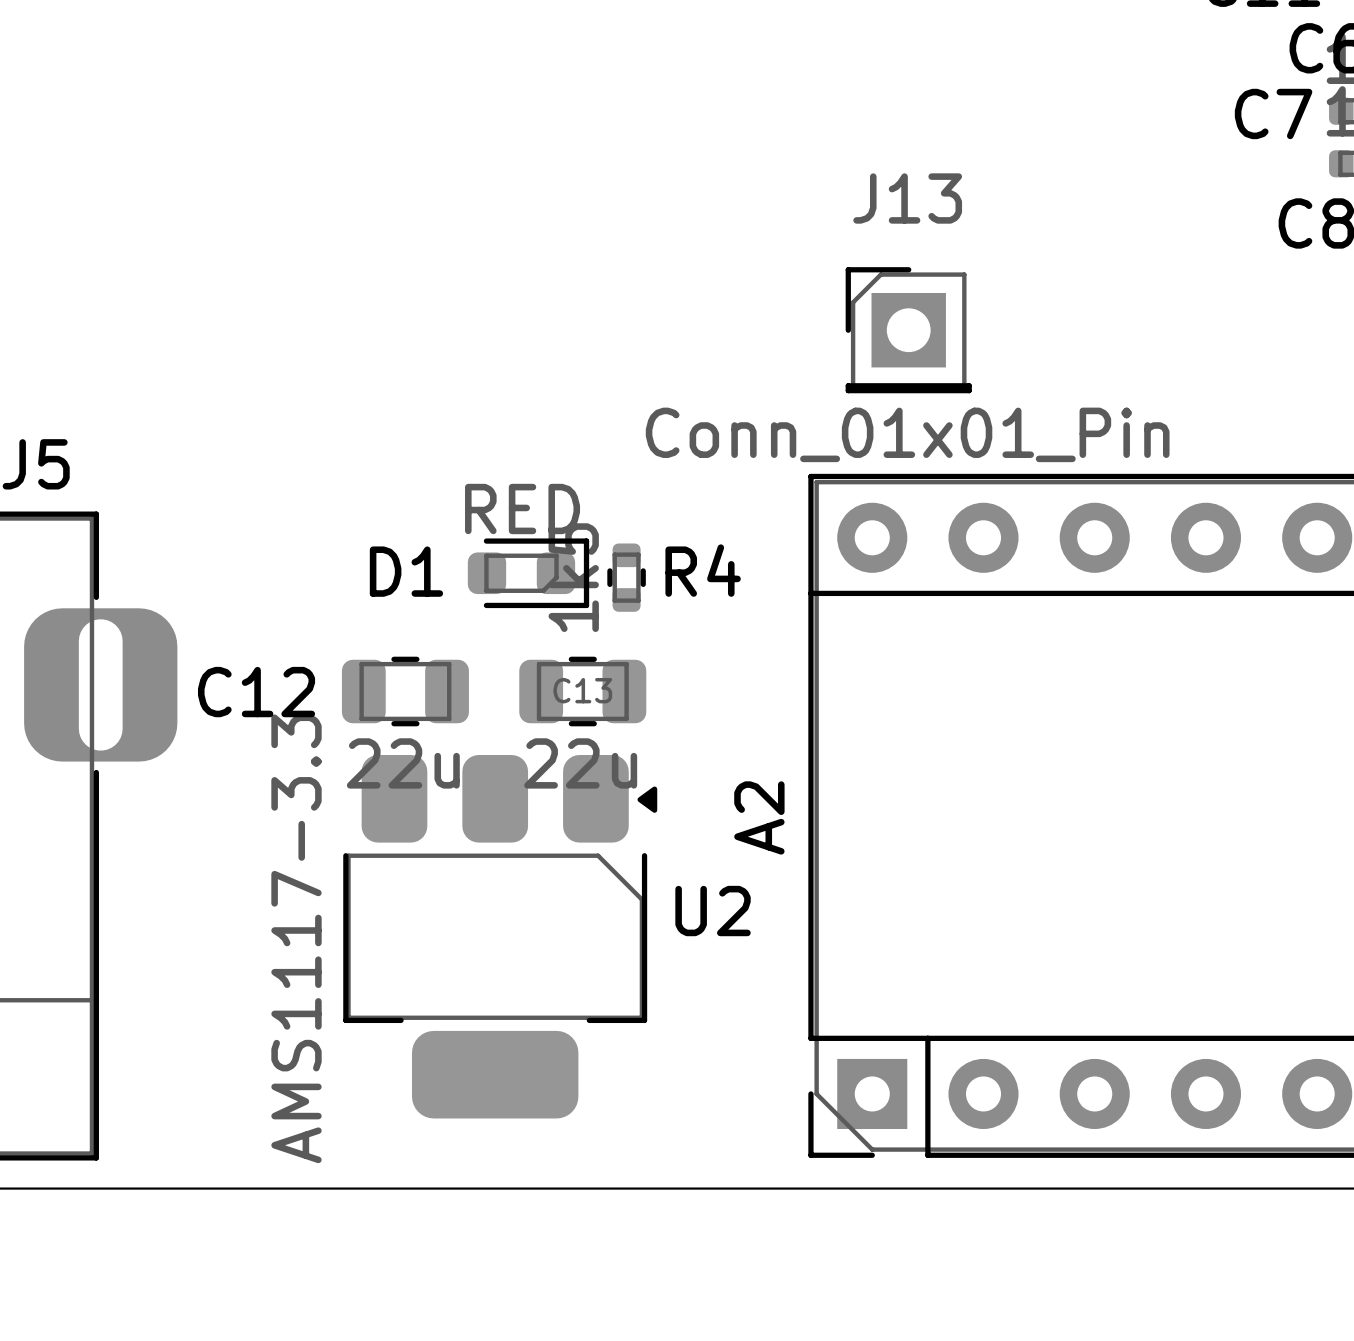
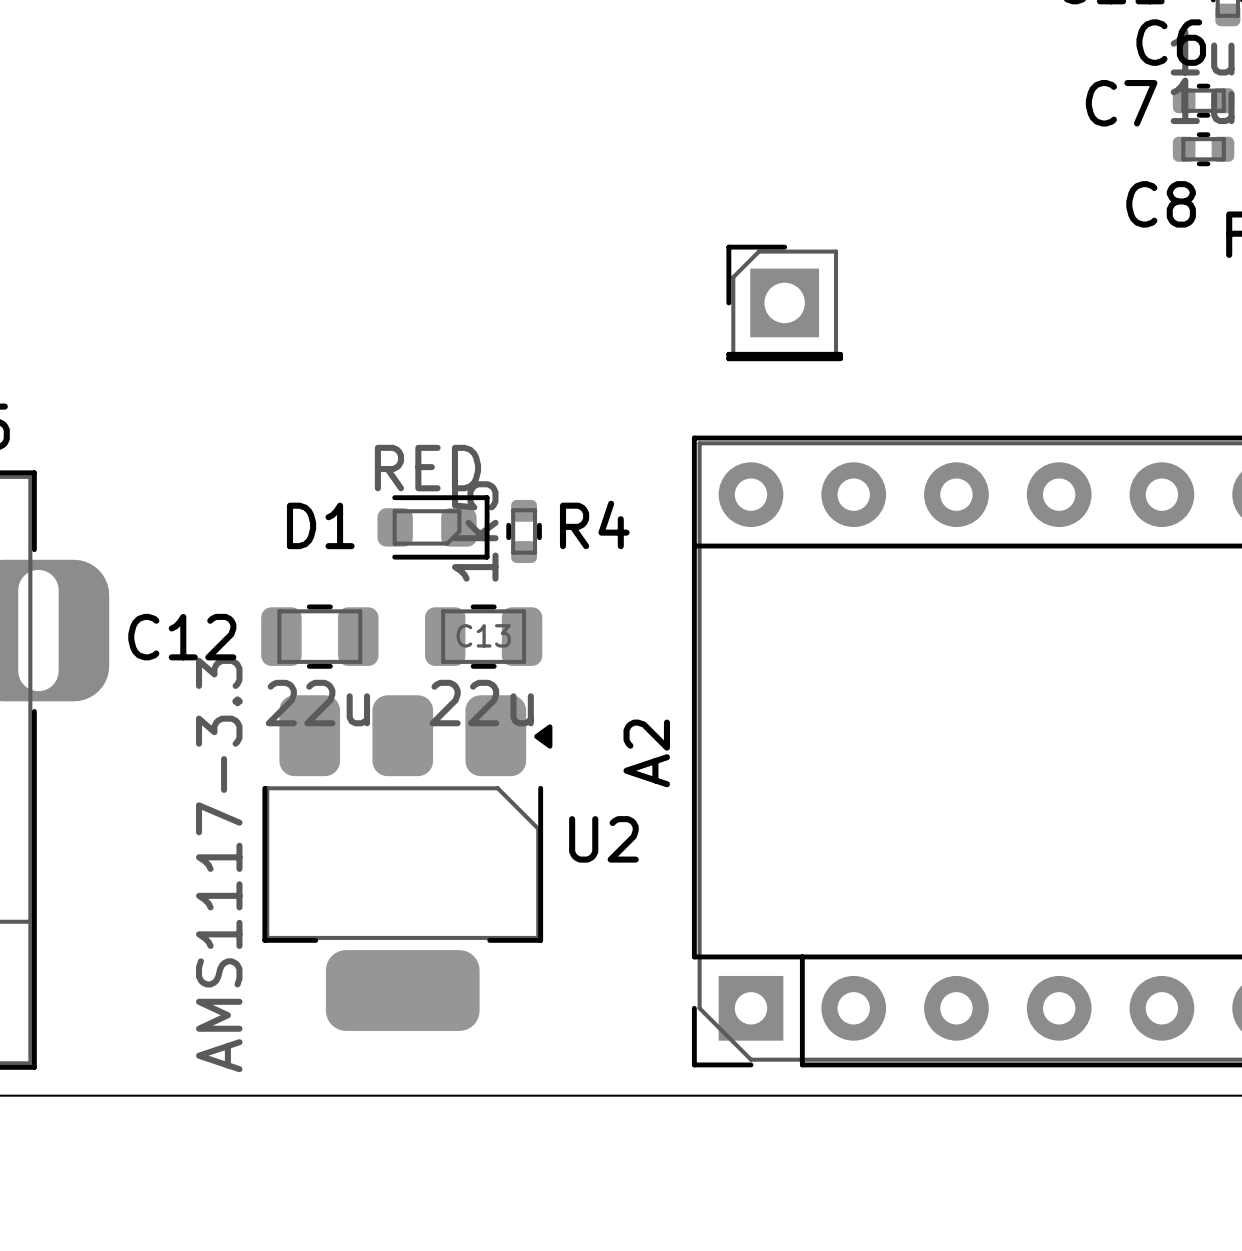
J13 name: J13 (907, 198) -> none
J13 value: Conn_01x01_Pin (907, 434) -> none

